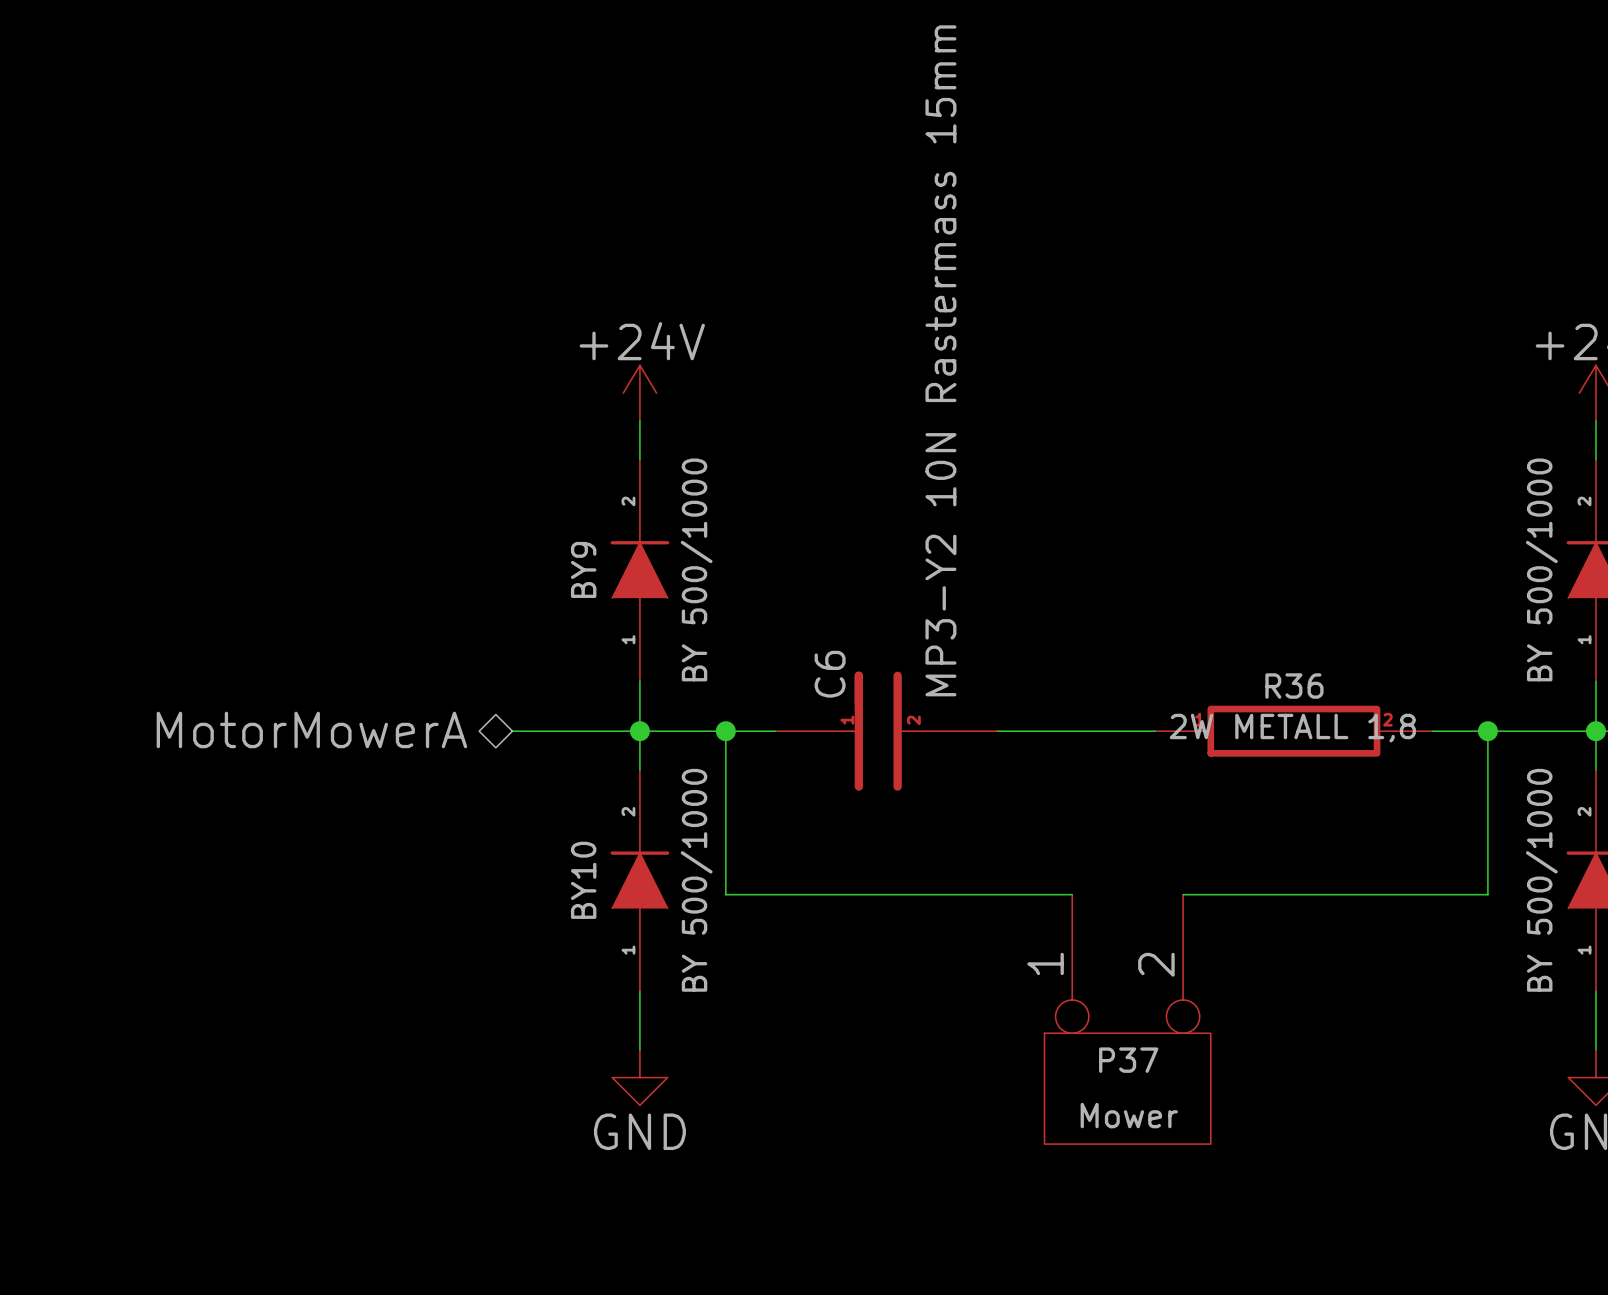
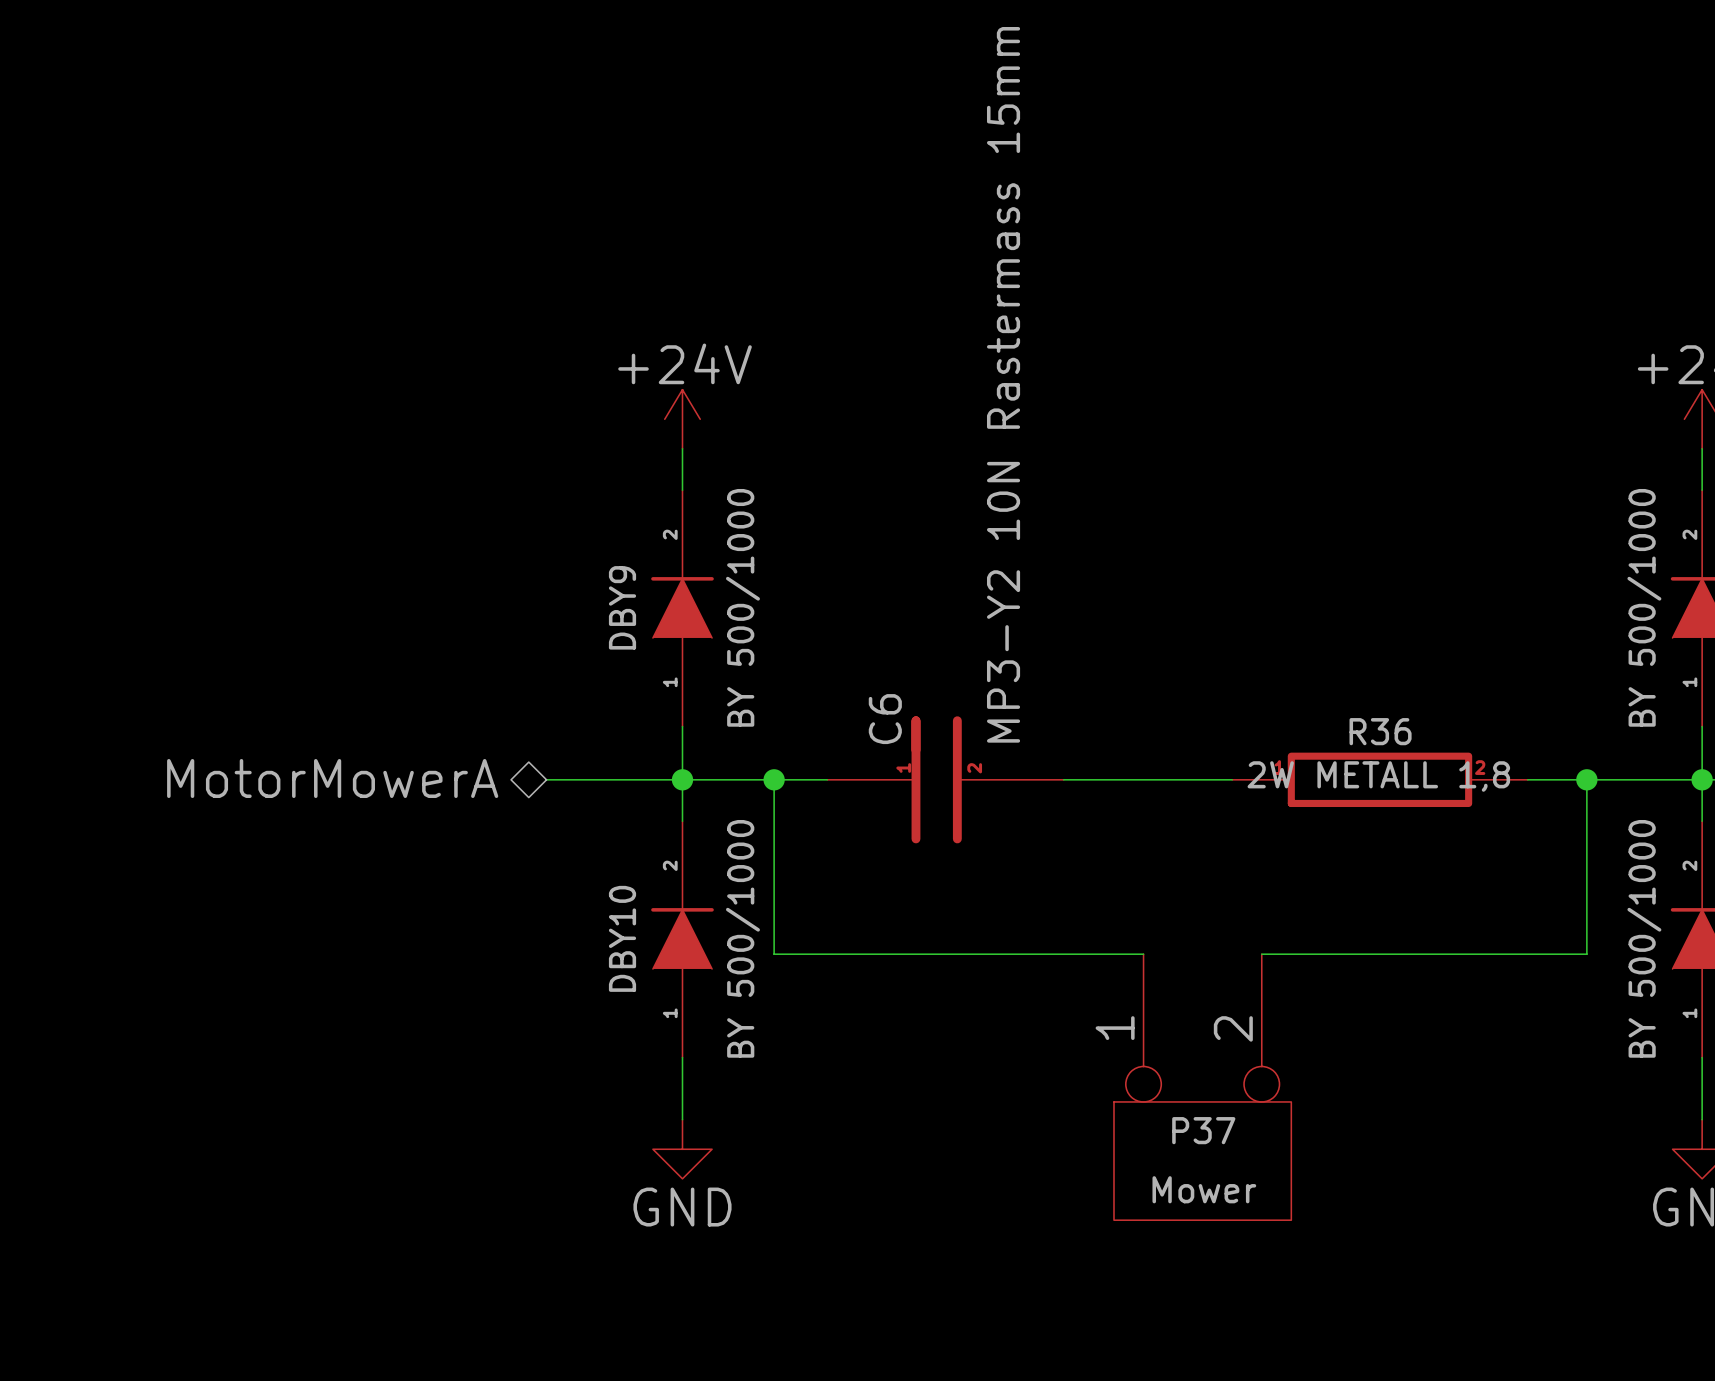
BY9 name: BY9 (583, 569) -> DBY9 (622, 607)
BY10 name: BY10 (583, 880) -> DBY10 (622, 938)

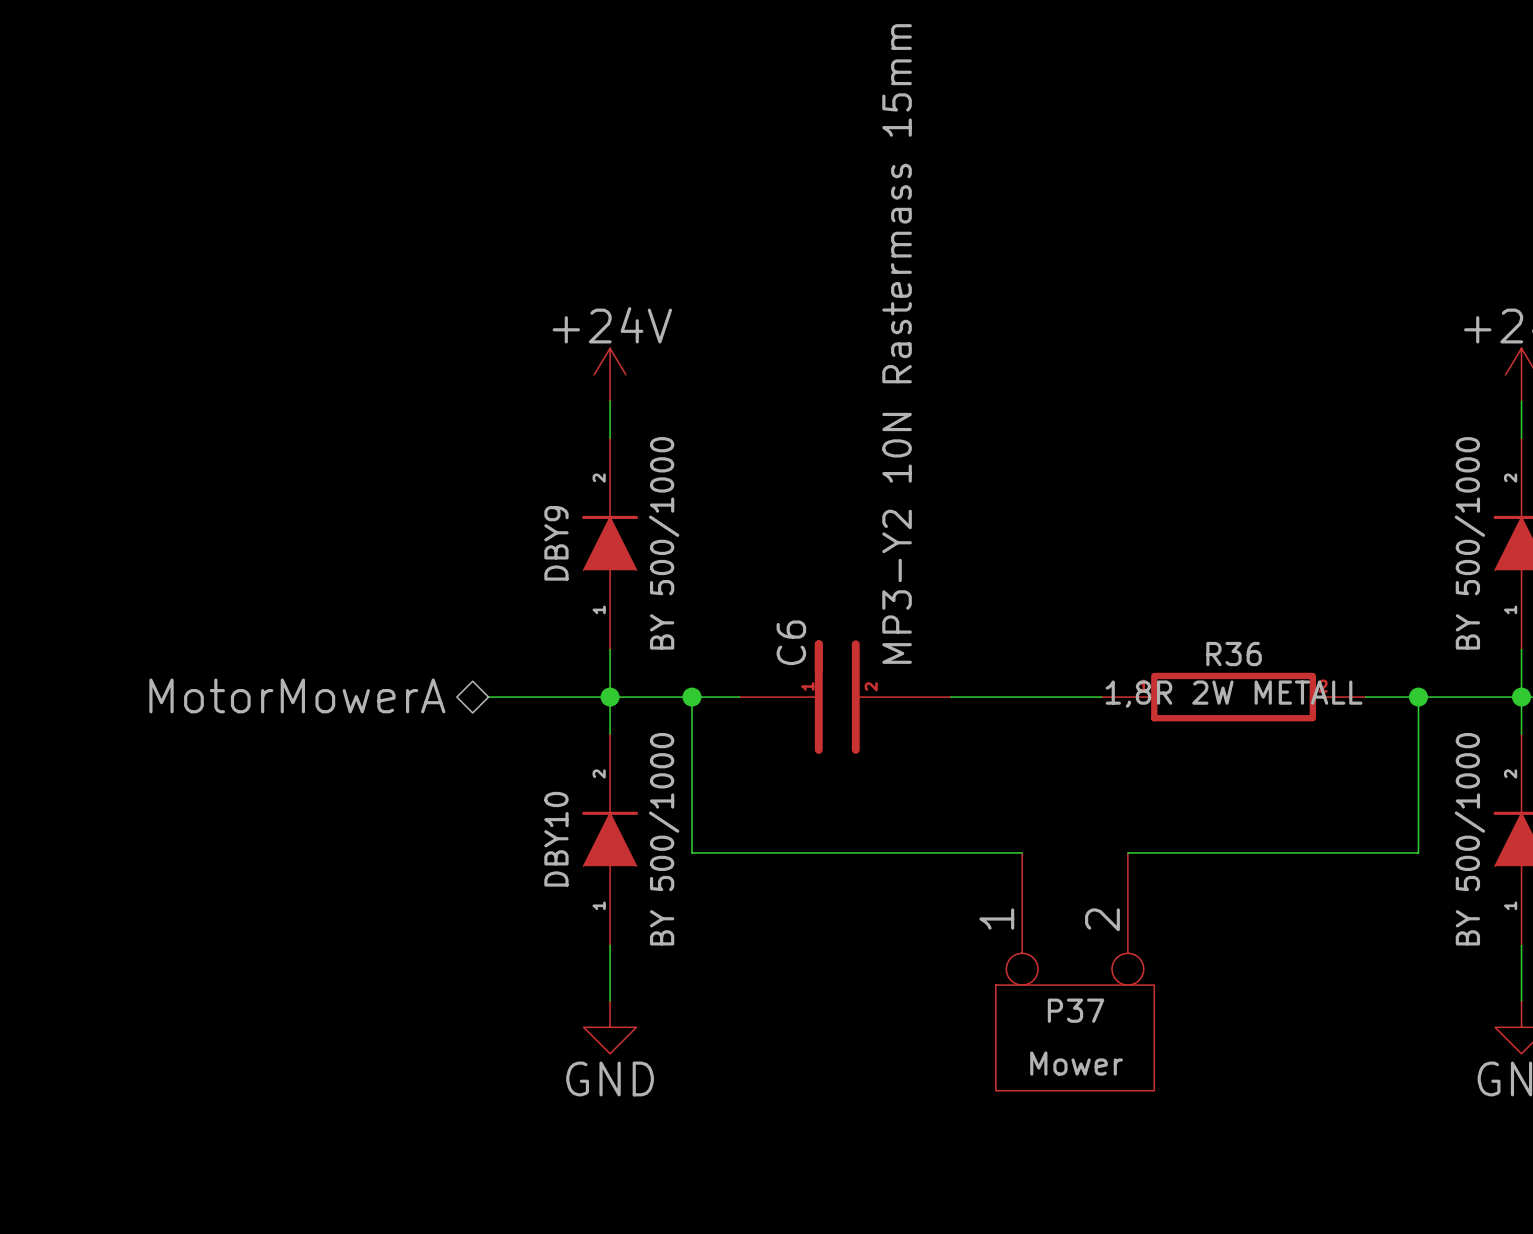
R36 value: 2W METALL 1,8 (1378, 776) -> 1,8R 2W METALL (1234, 694)

